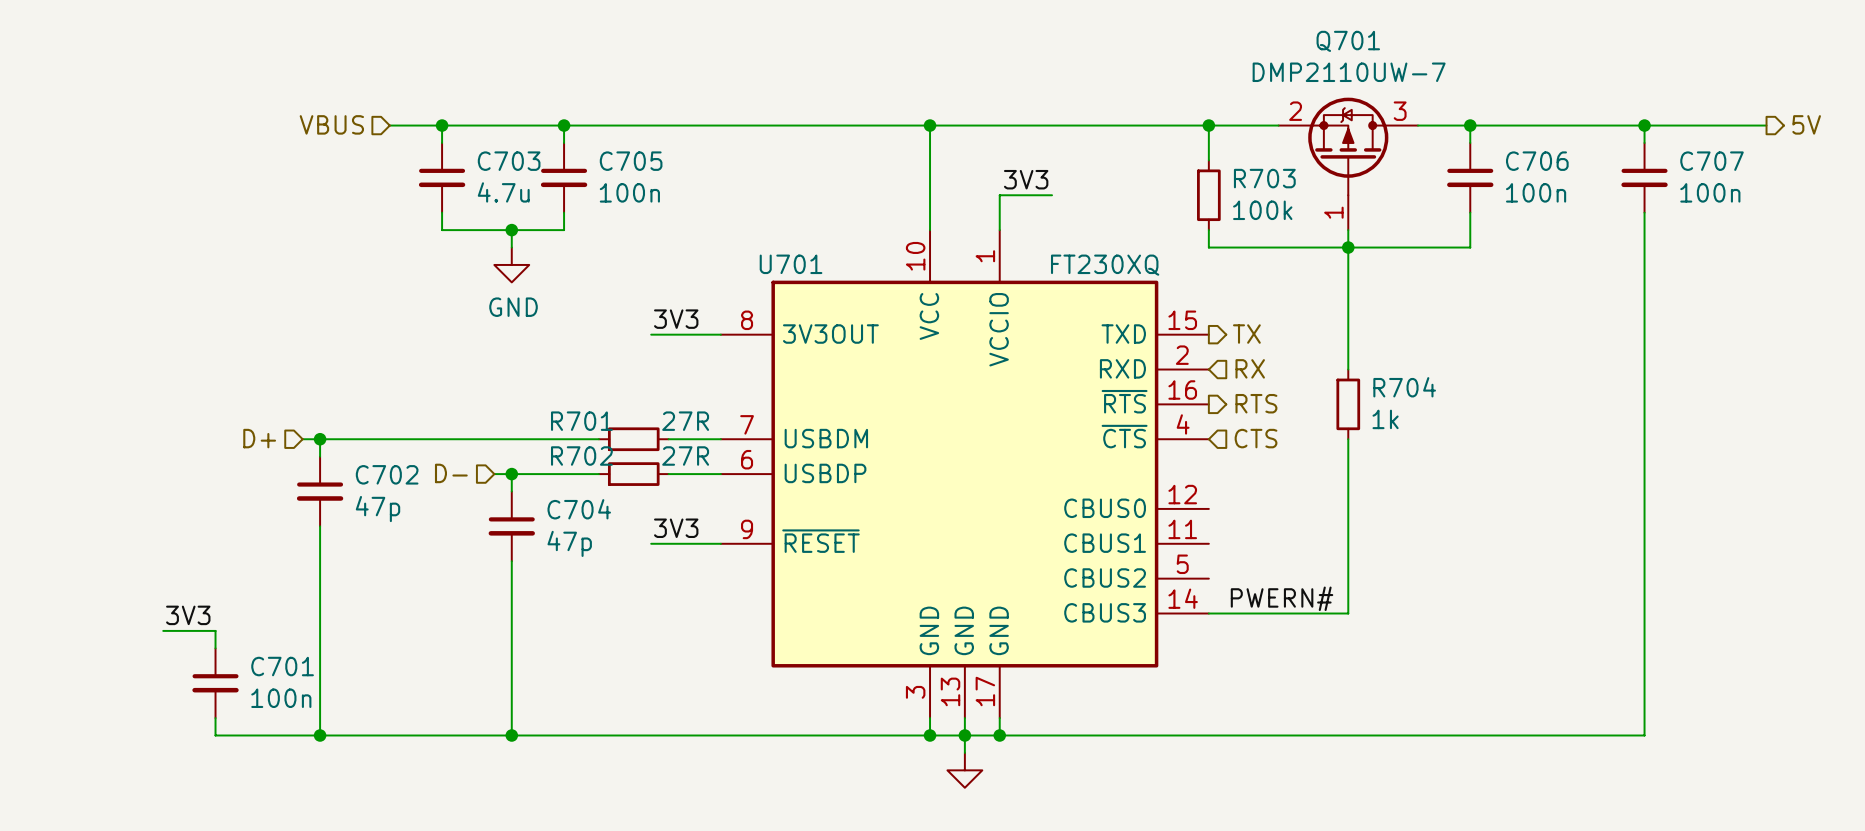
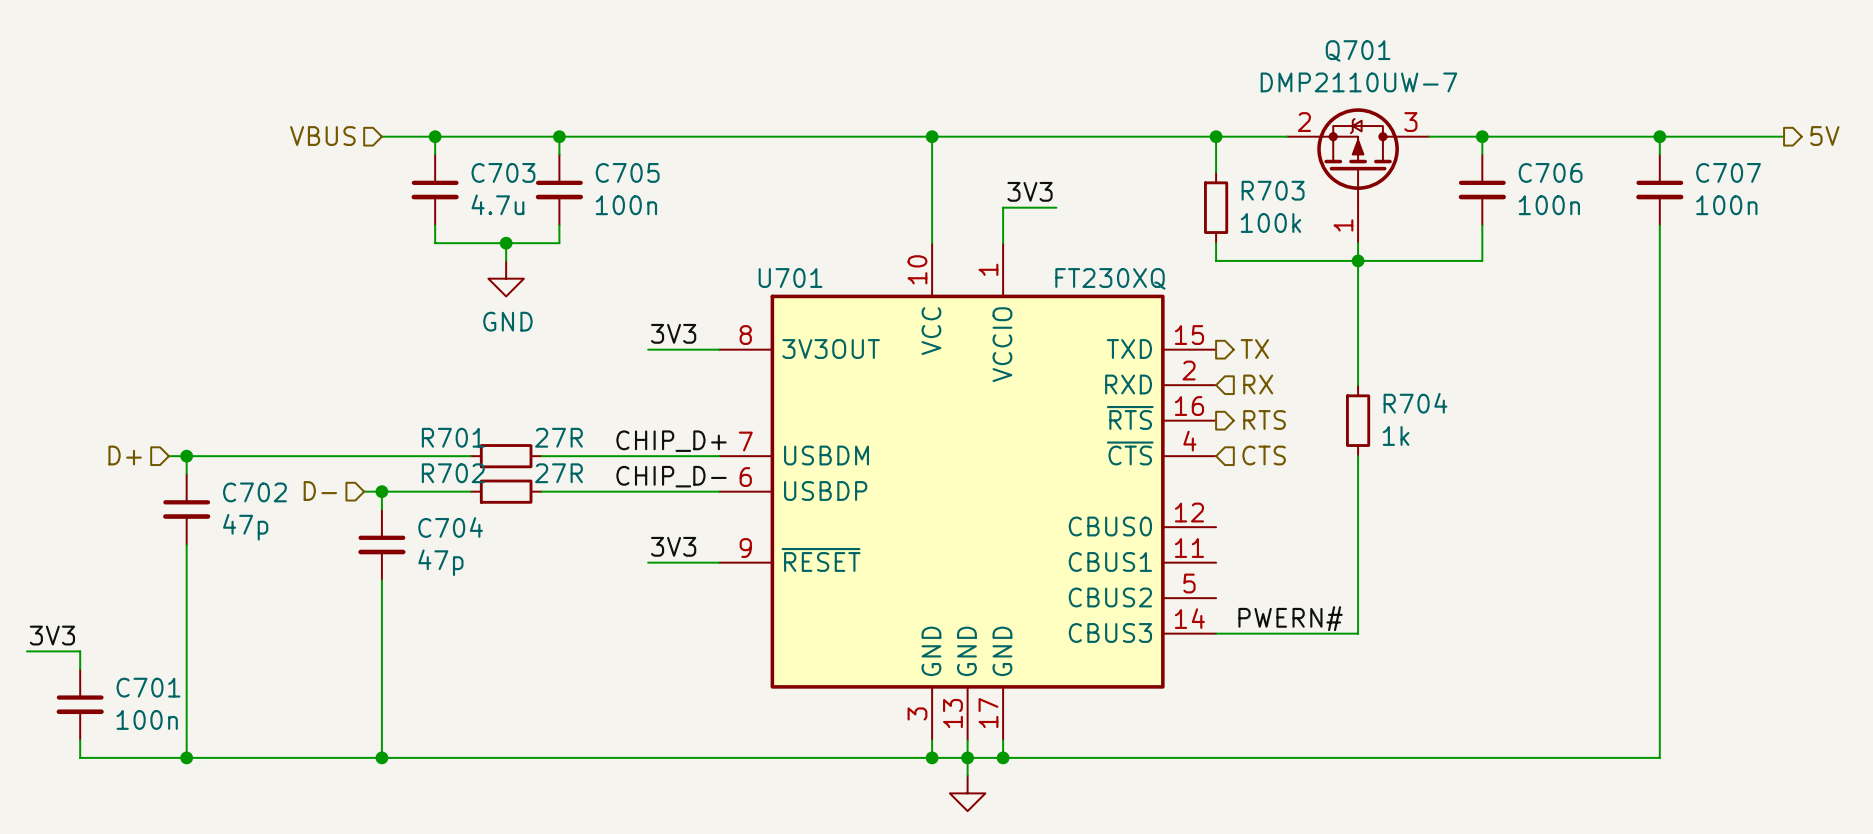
label: none -> CHIP_D+ (671, 441)
hierarchical label position: D+ (259, 438) -> D+ (125, 455)
wire: none -> (168, 456) (293, 456)
junction: none -> (186, 456)
wire: (320, 439) (320, 456) -> (186, 456) (186, 473)
junction: (320, 439) -> none
wire: (476, 439) (546, 439) -> (594, 456) (665, 456)
R701 position: (633, 439) -> (506, 456)
label: none -> CHIP_D- (671, 476)
hierarchical label position: D- (451, 473) -> D- (320, 491)
wire: none -> (364, 491) (470, 491)
junction: none -> (381, 491)
wire: (494, 474) (546, 474) -> none
wire: (511, 474) (511, 491) -> (381, 491) (381, 509)
junction: (511, 474) -> none
wire: none -> (594, 491) (665, 491)
R702 position: (633, 474) -> (506, 491)
C702 position: (320, 491) -> (186, 509)
wire: (320, 526) (320, 735) -> (186, 544) (186, 757)
C704 position: (511, 526) -> (381, 544)
wire: (511, 561) (511, 735) -> (381, 580) (381, 757)
label position: 3V3 (188, 615) -> 3V3 (52, 635)
wire: (163, 630) (215, 630) (215, 648) -> (26, 651) (80, 651) (80, 669)
C701 position: (215, 683) -> (80, 704)
wire: (215, 718) (215, 735) -> (80, 740) (80, 757) (204, 757)
junction: none -> (186, 757)
junction: (320, 735) -> none
junction: none -> (381, 757)
junction: (511, 735) -> none

